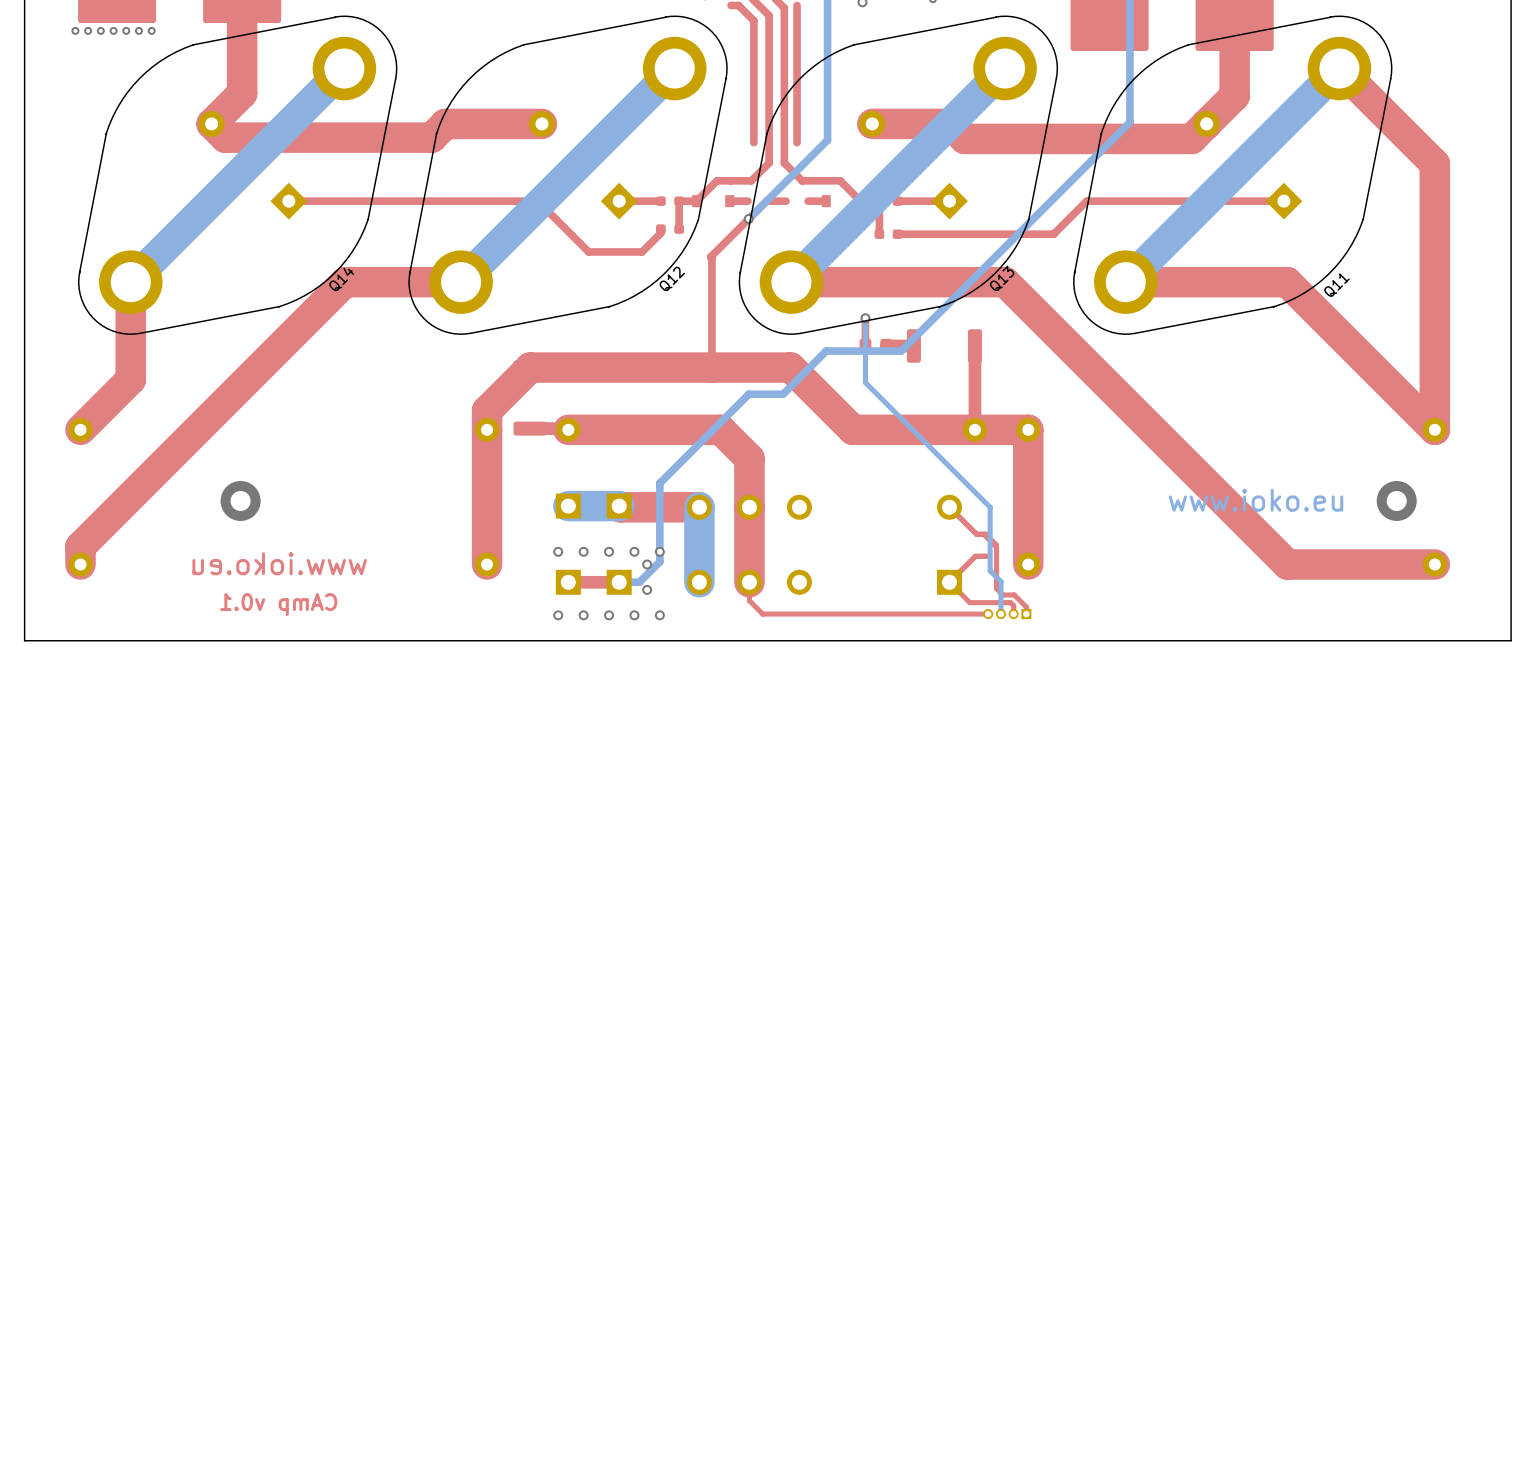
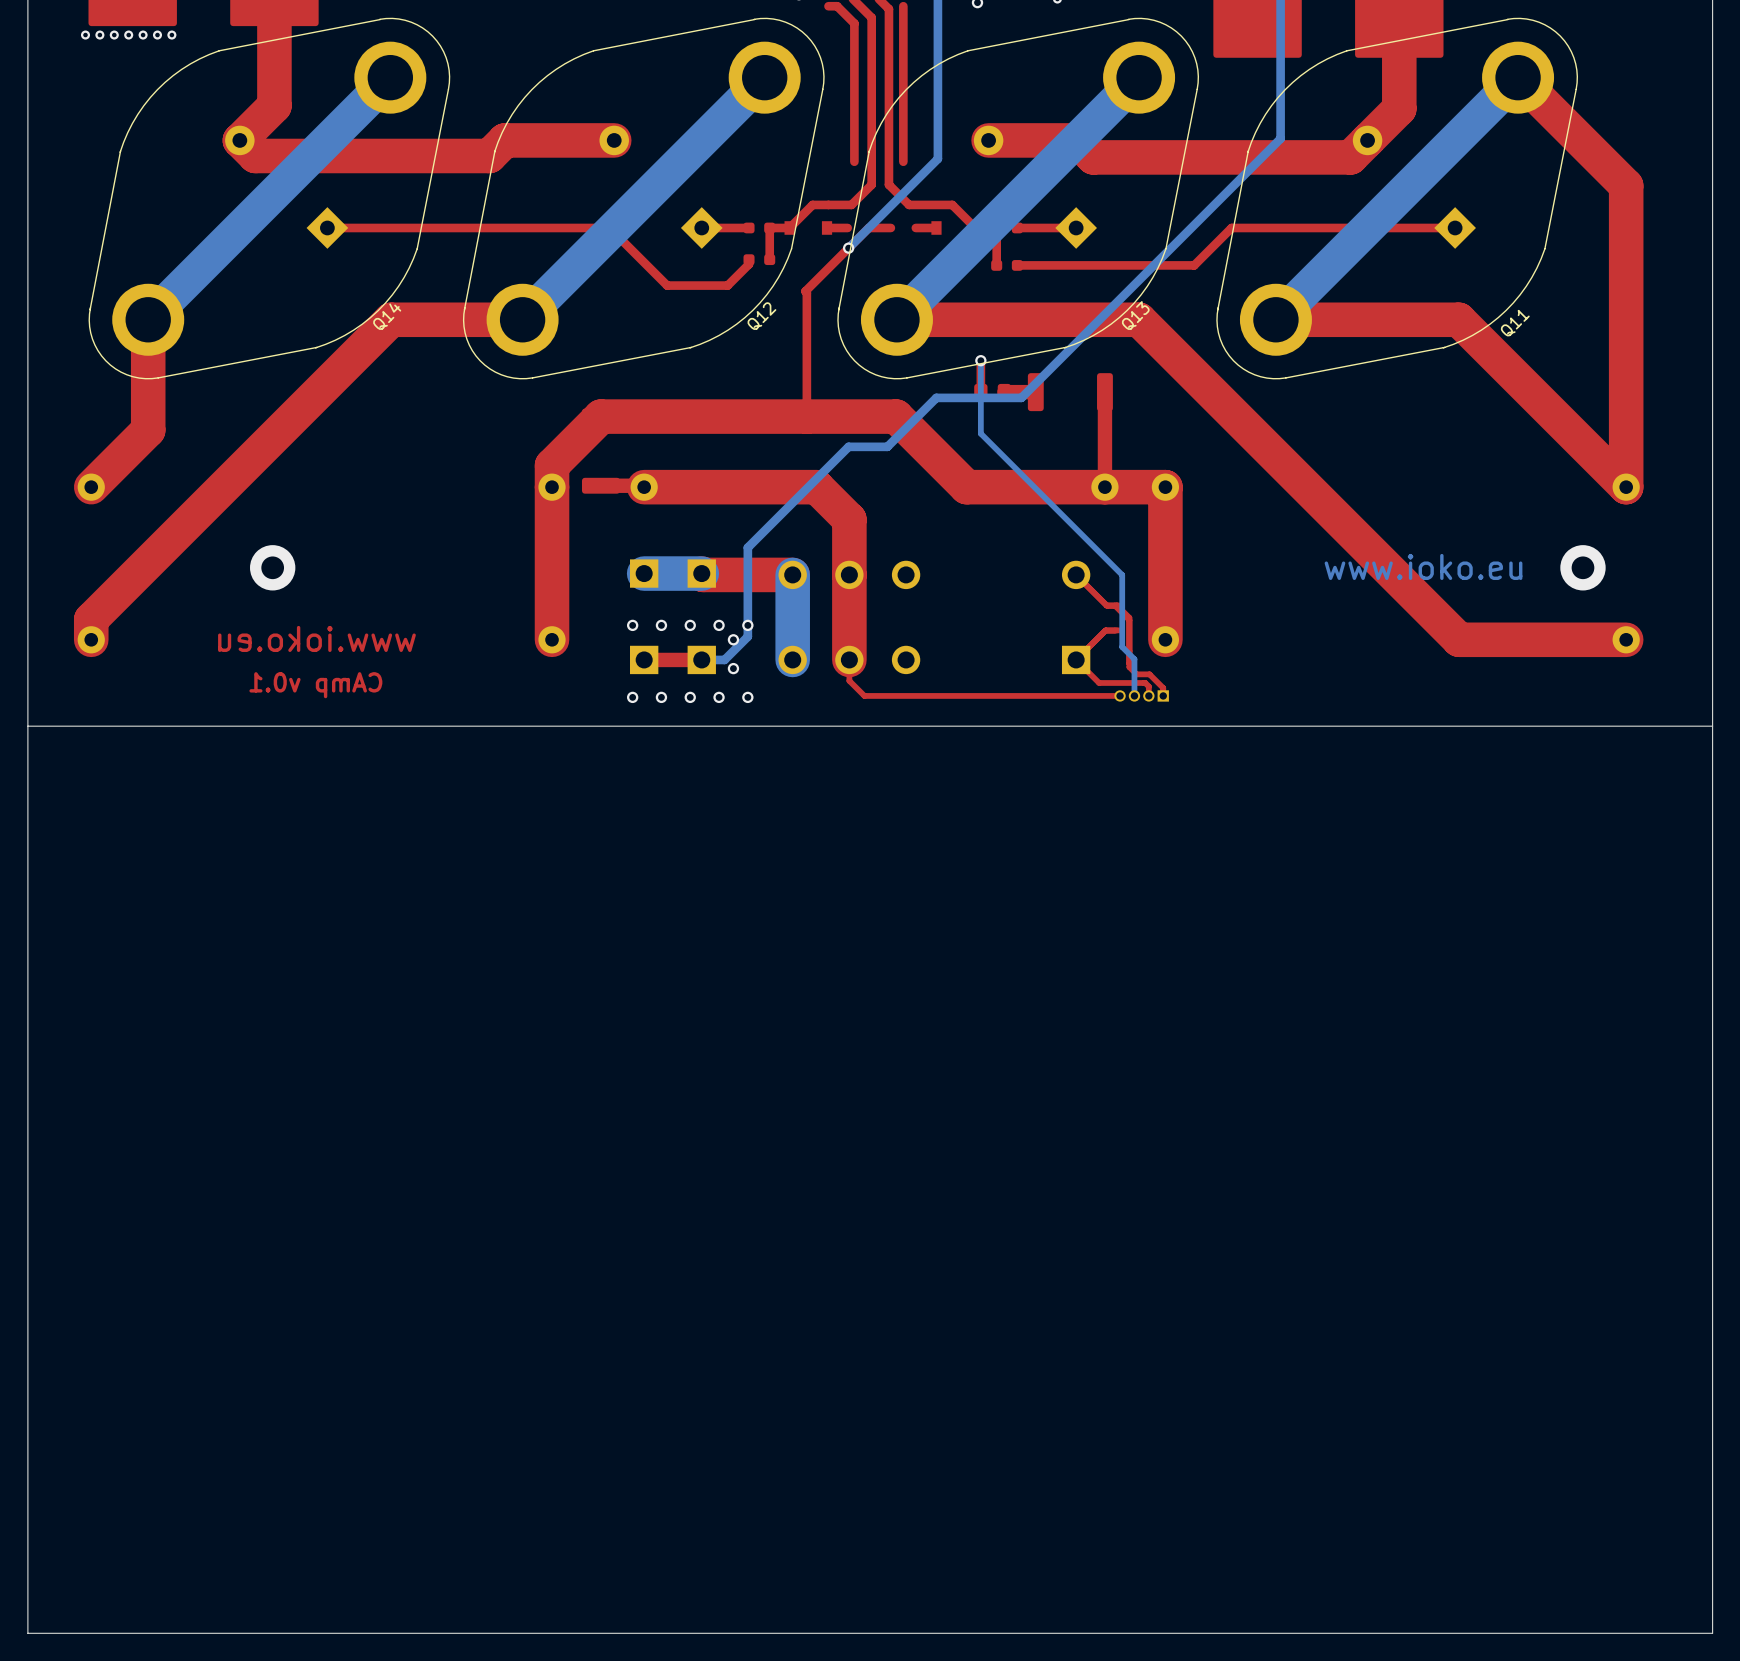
board edge: none -> (1712, 726) (1712, 1633) (27, 1633) (27, 726)

